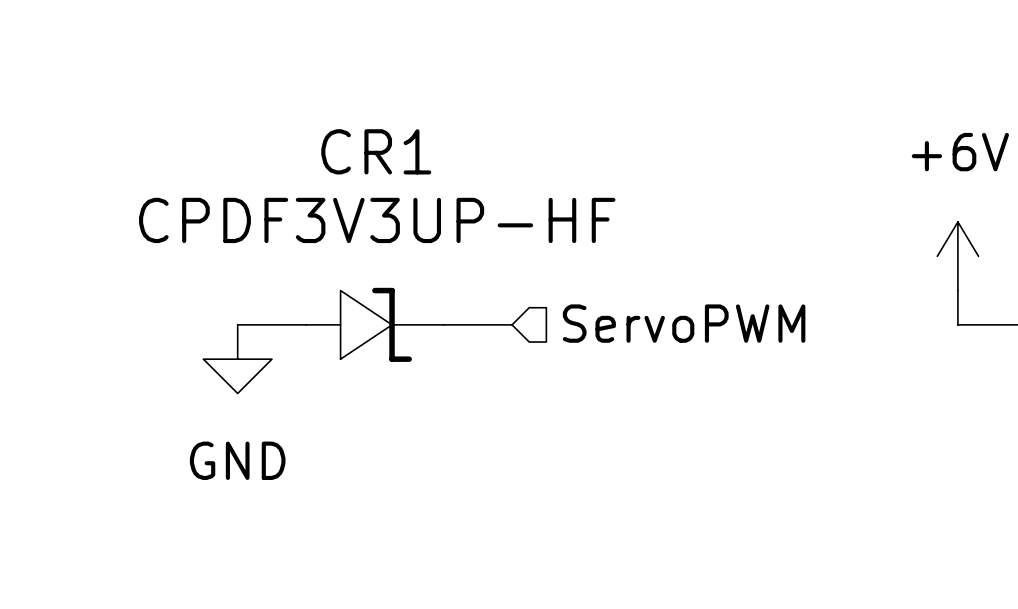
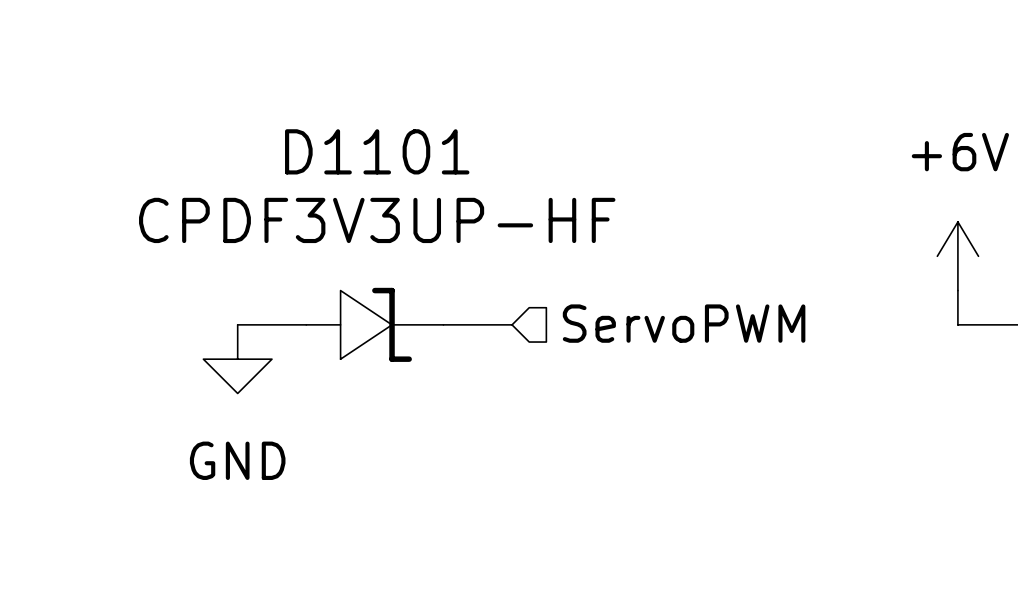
CR1 name: CR1 (376, 151) -> D1101 (377, 151)

